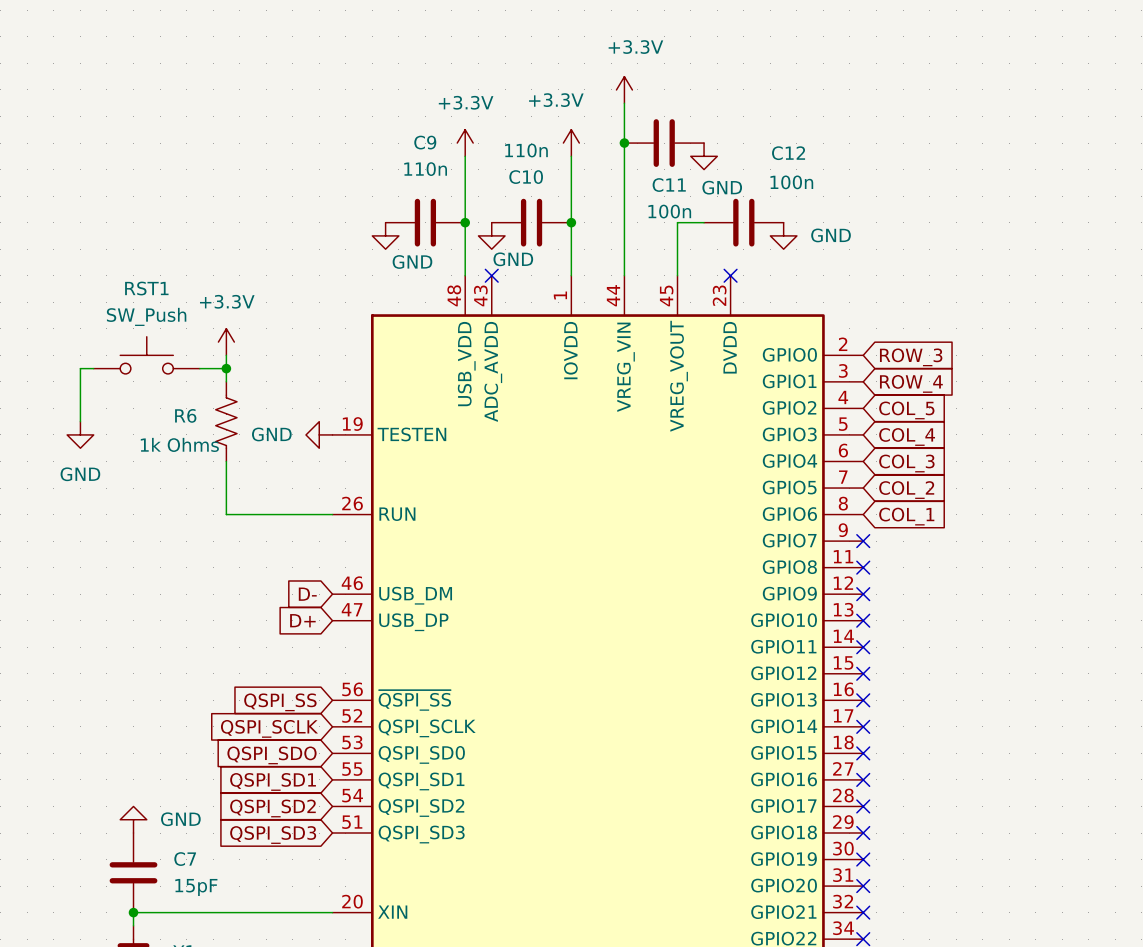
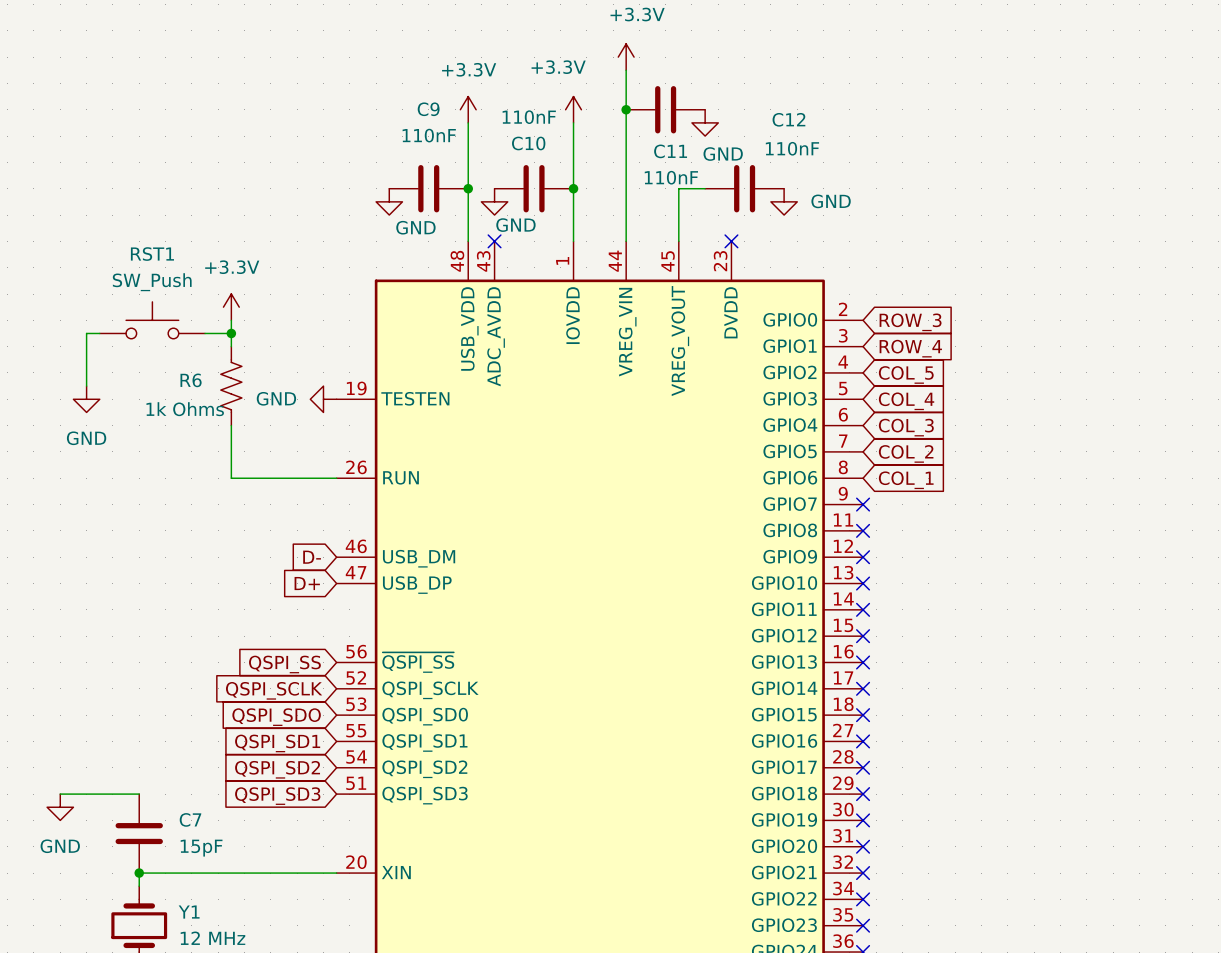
C10 value: 110n (526, 150) -> 110nF (529, 117)
C9 value: 110n (425, 169) -> 110nF (429, 135)
C12 value: 100n (791, 182) -> 110nF (792, 148)
C11 value: 100n (669, 211) -> 110nF (671, 177)
power symbol rotation: 0° (133, 819) -> 180° (60, 807)
power symbol position: GND (133, 819) -> GND (60, 807)
power symbol text position: GND (180, 819) -> GND (60, 846)
wire: none -> (60, 794) (139, 794)

